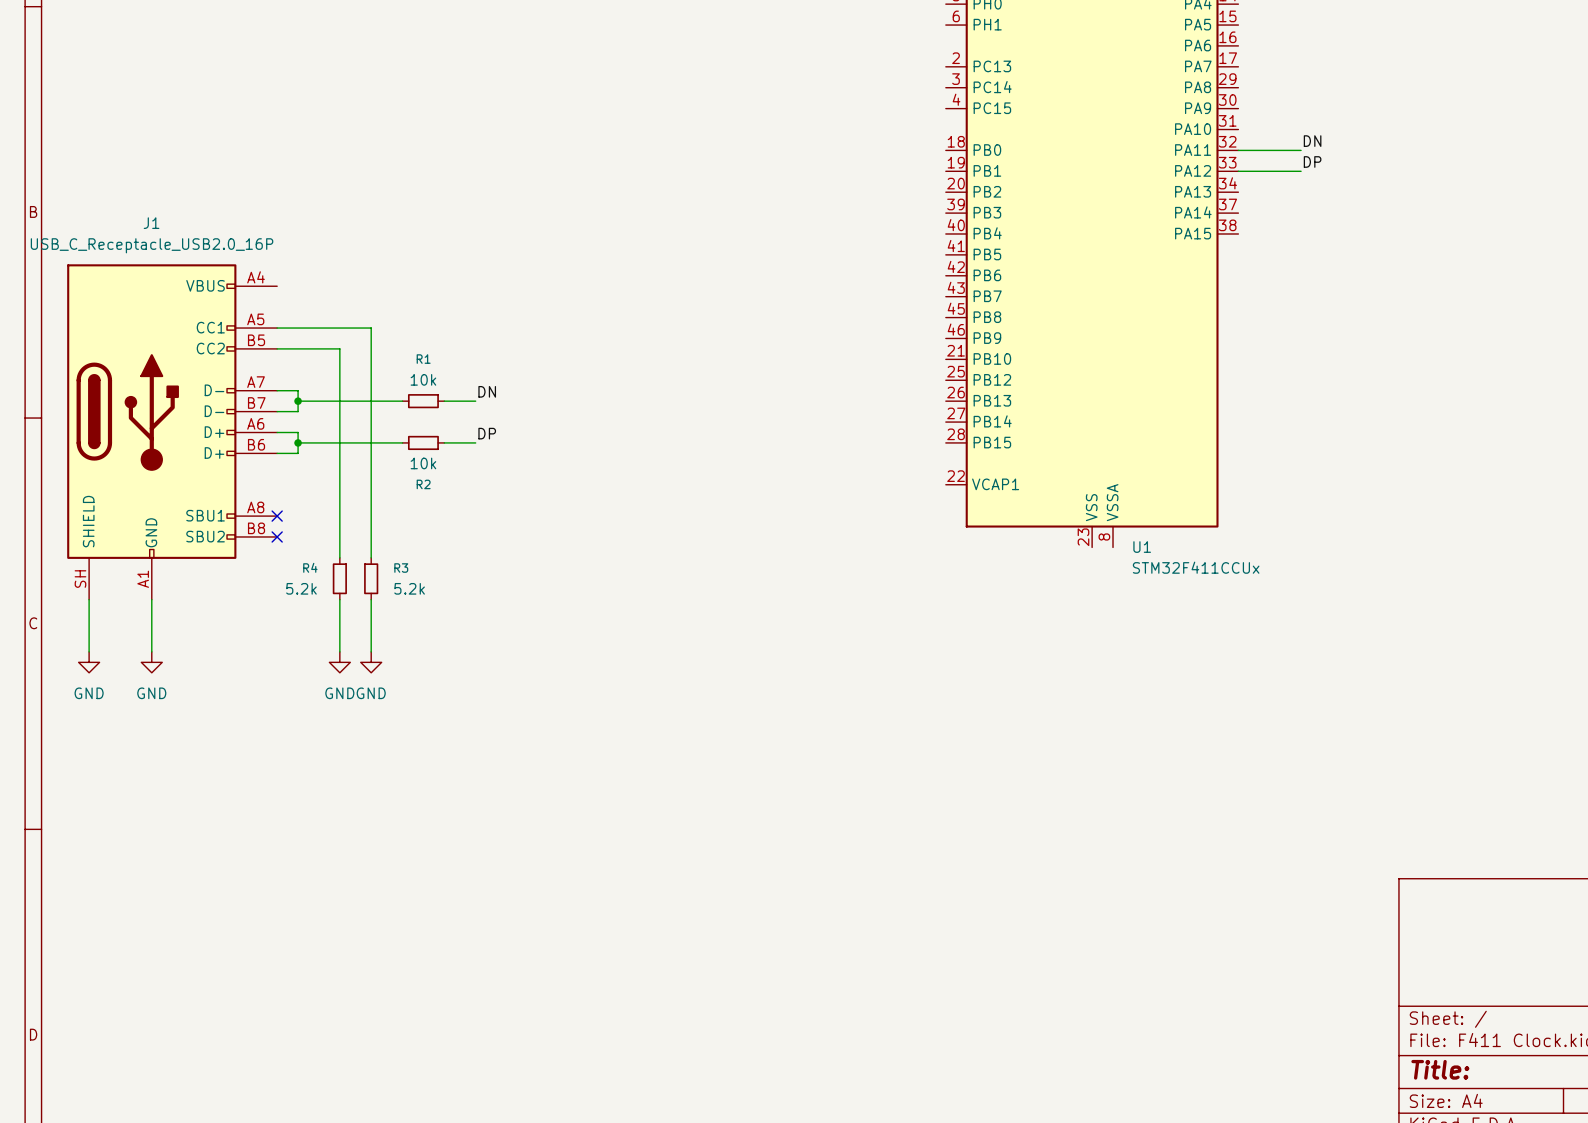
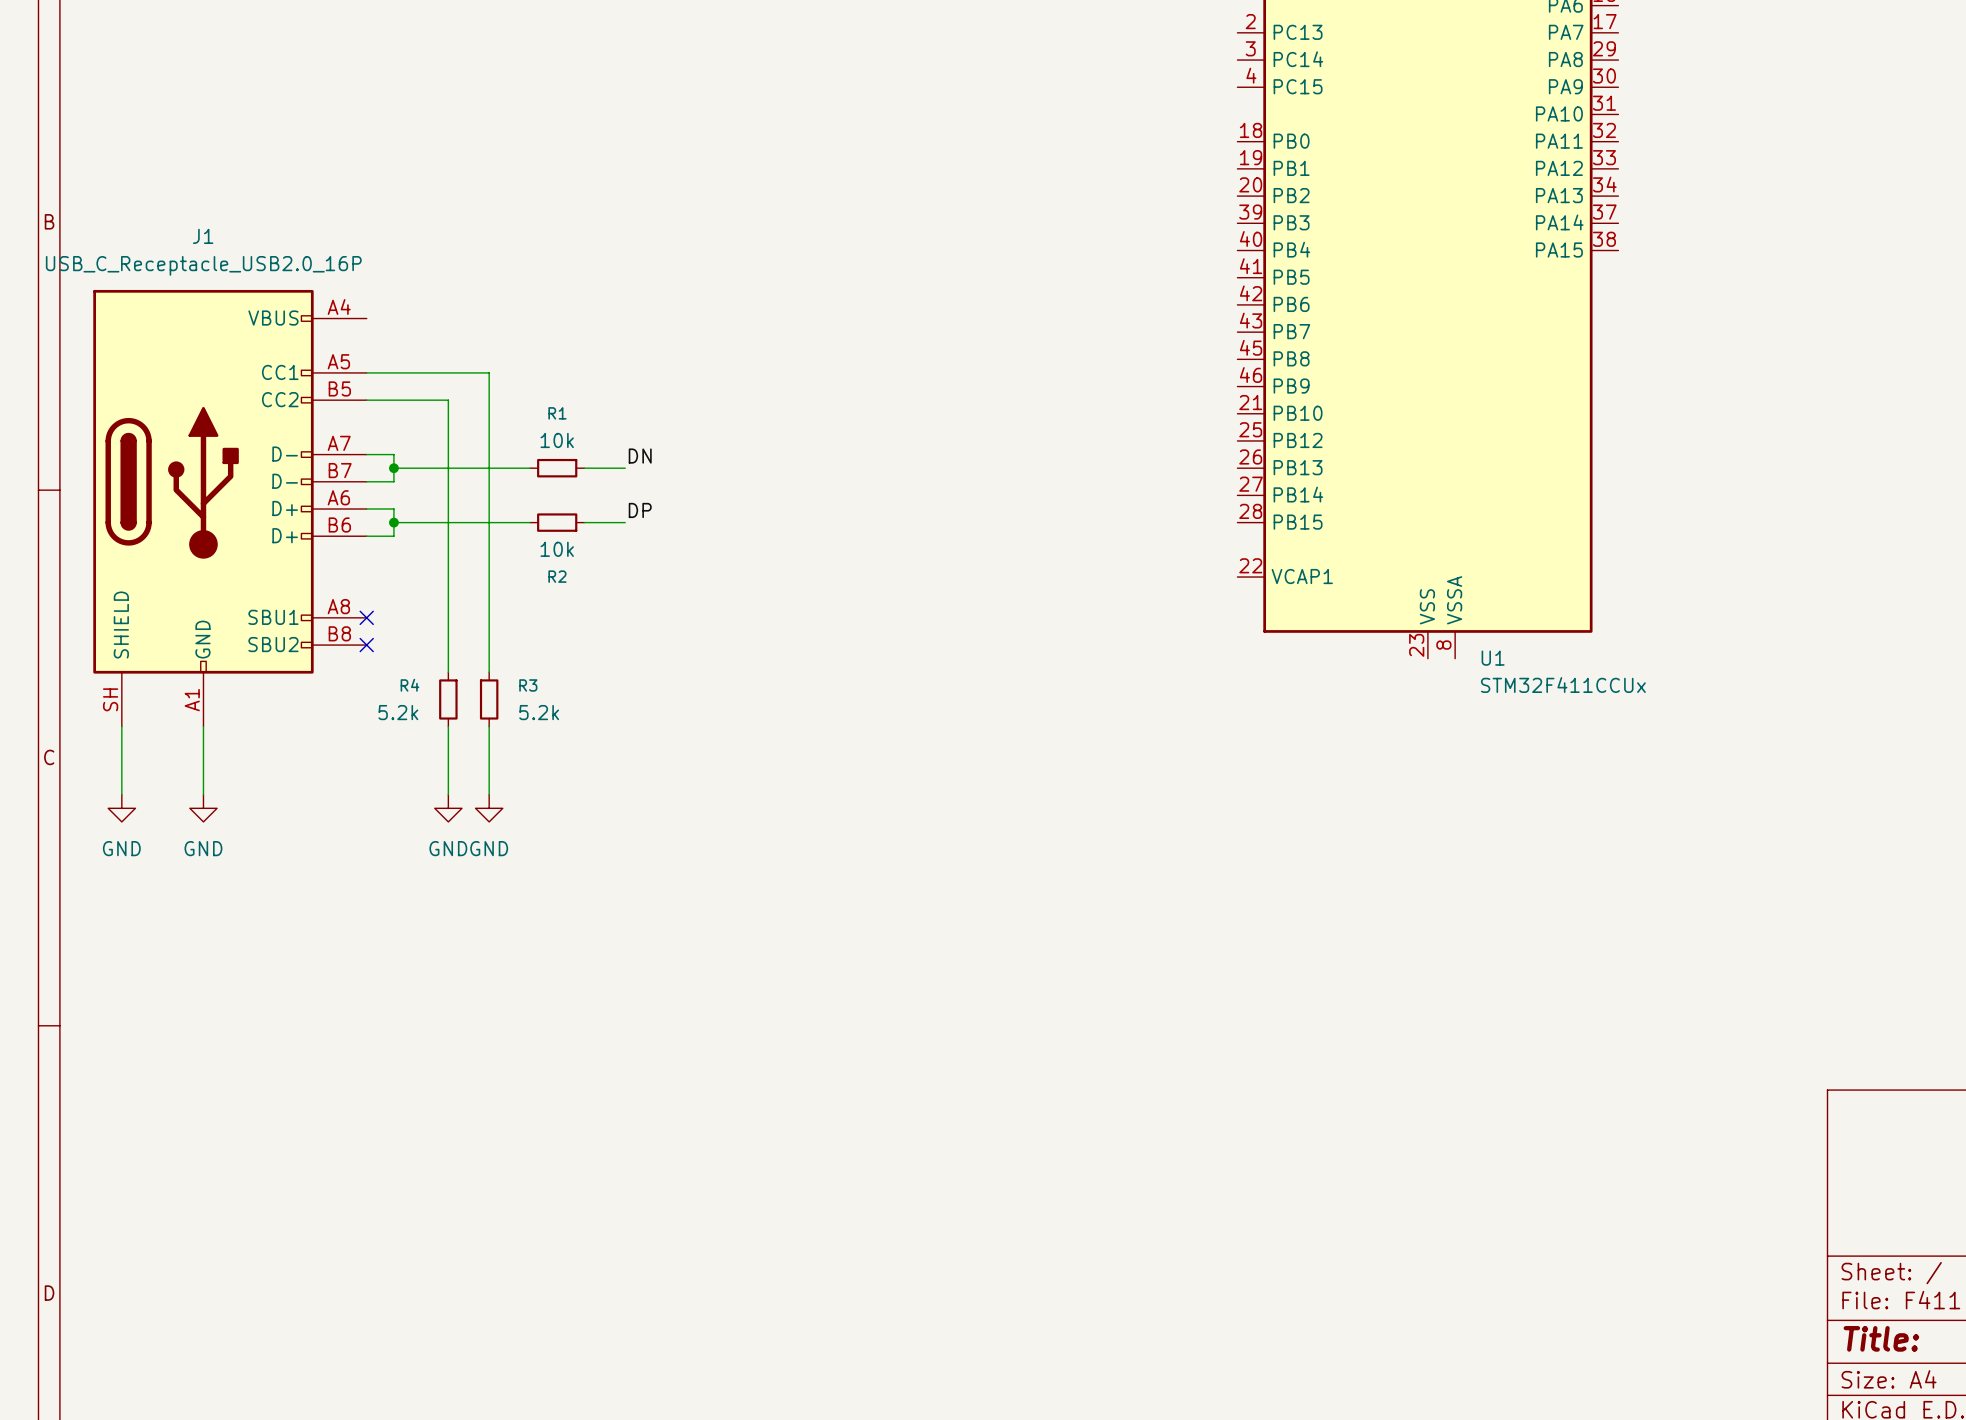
label: DN (1312, 141) -> none
wire: (1238, 150) (1301, 150) -> none
label: DP (1312, 161) -> none
wire: (1238, 171) (1301, 171) -> none

